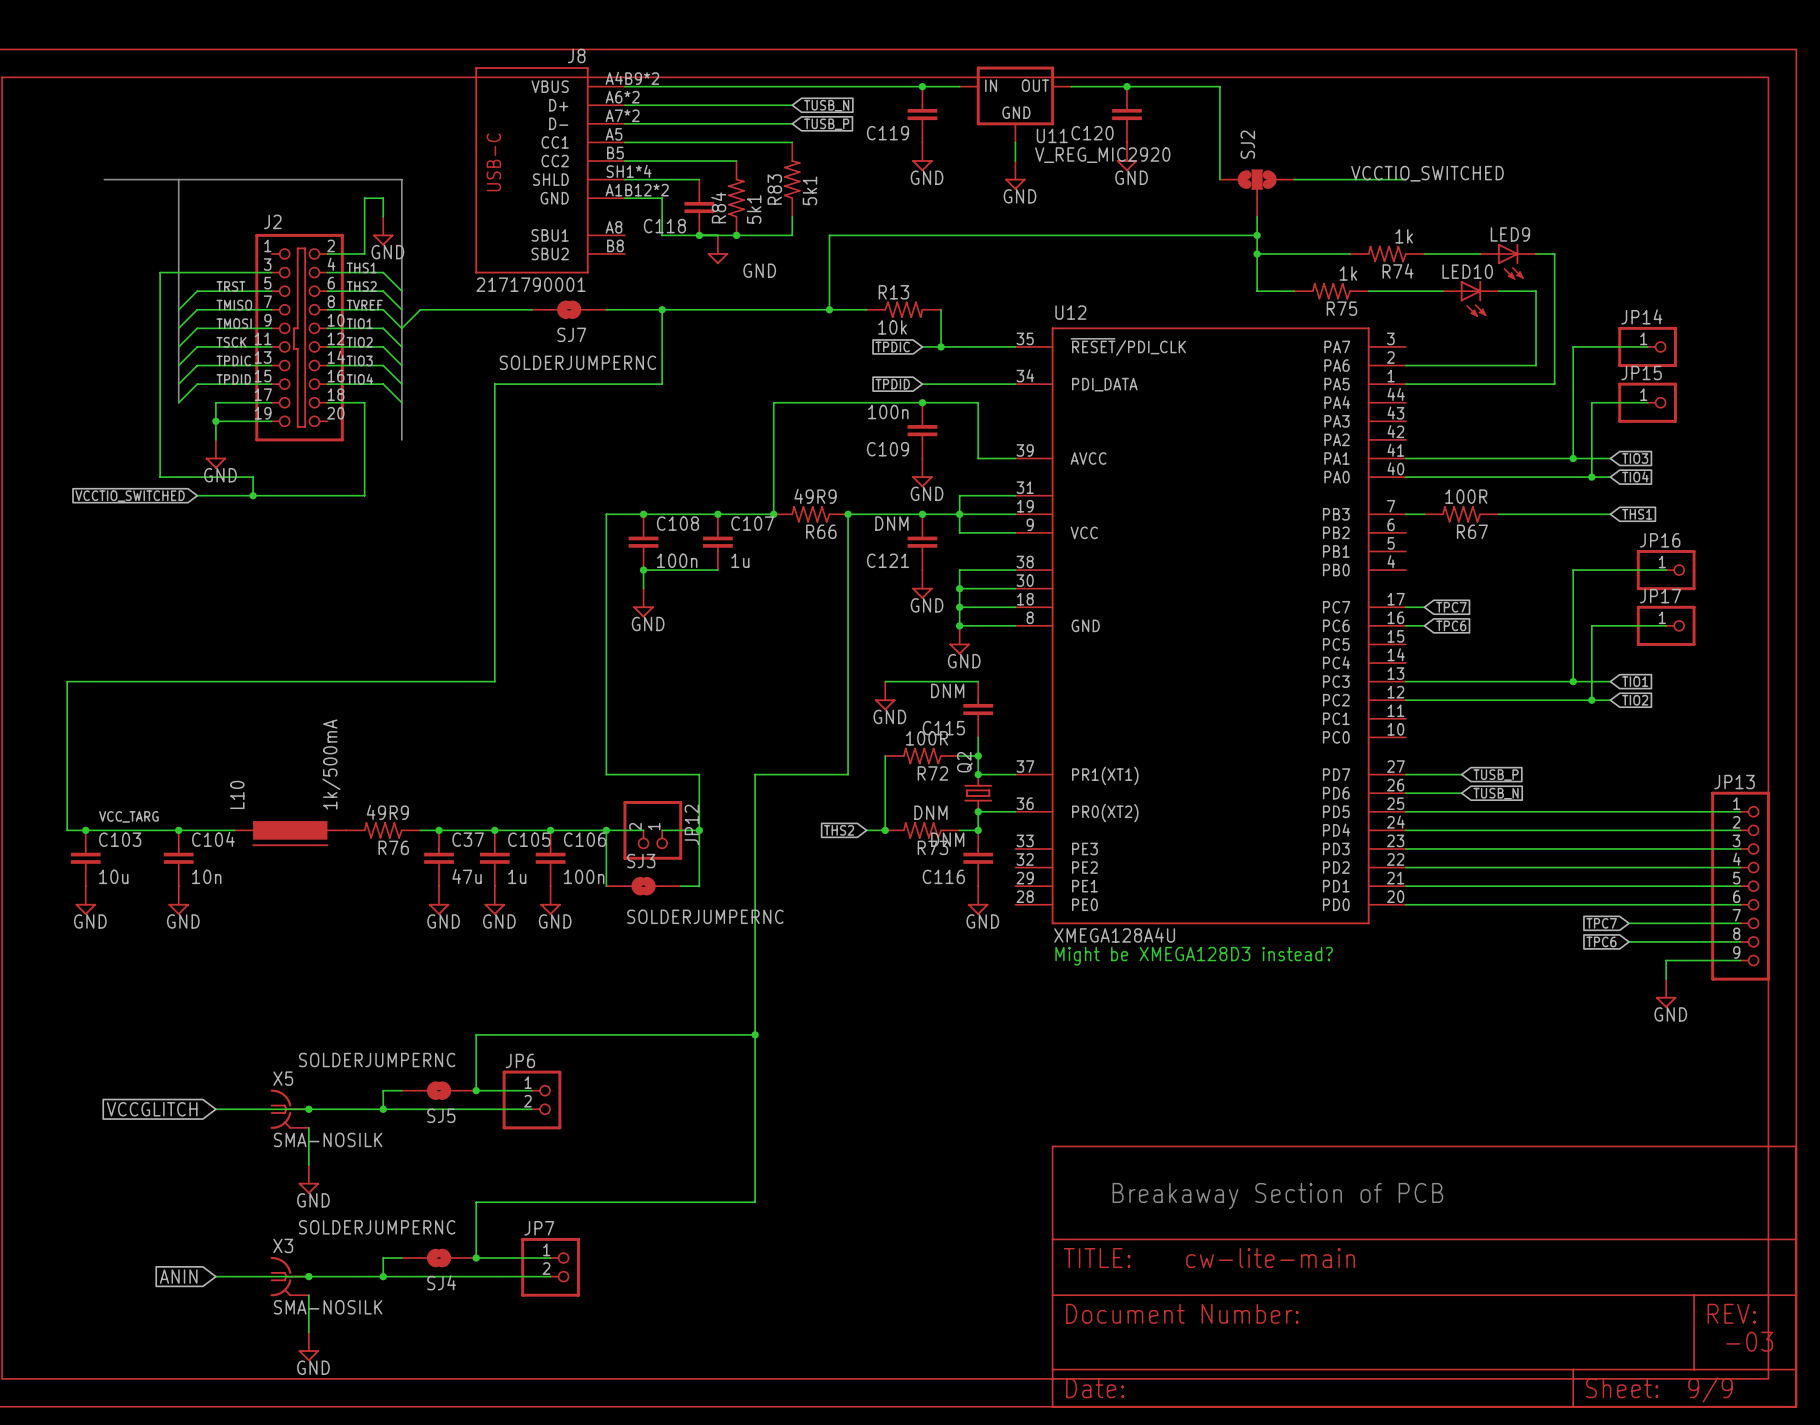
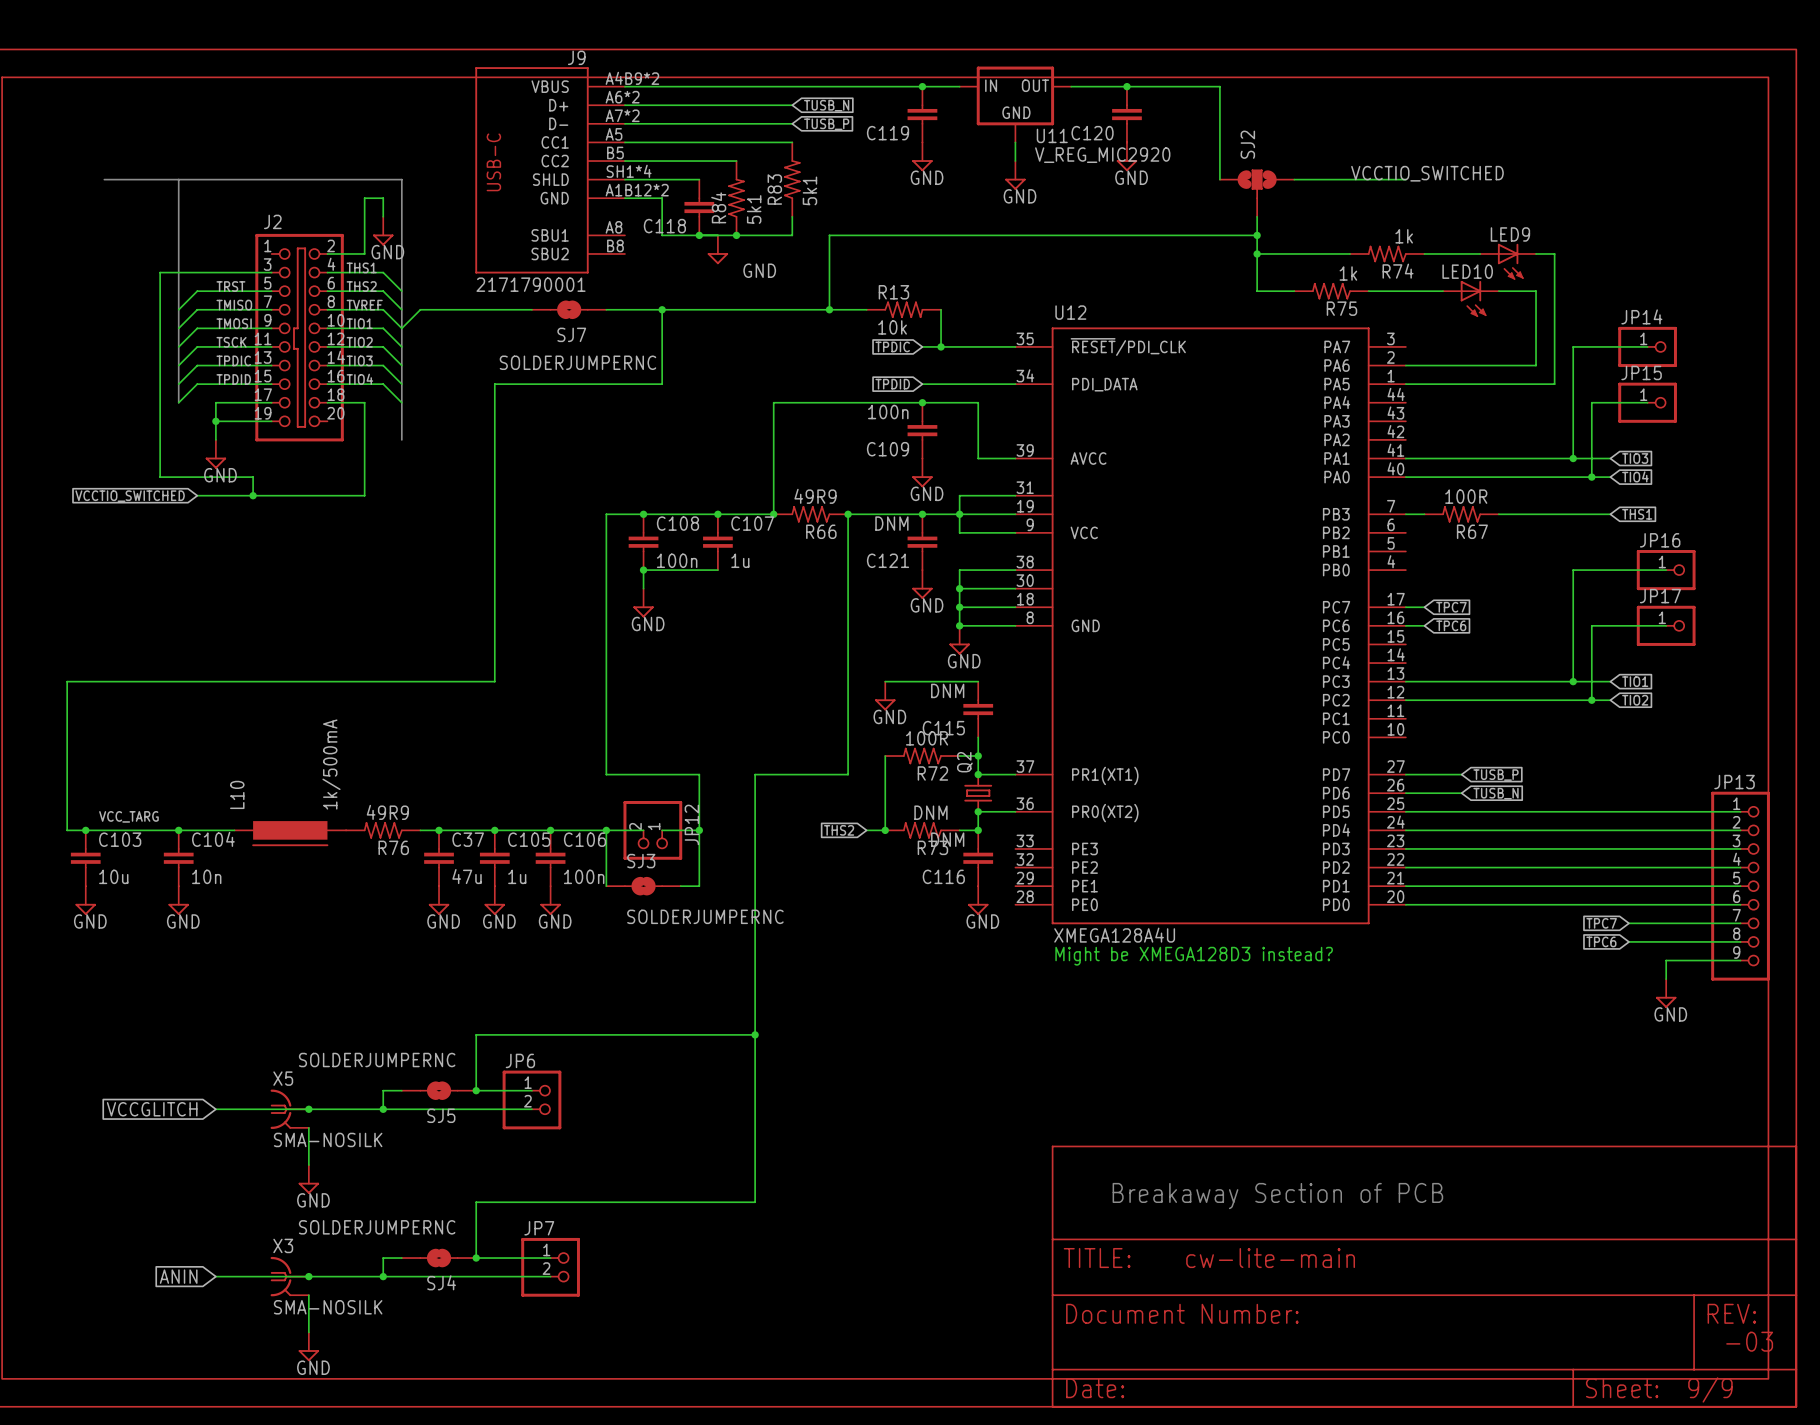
J8 name: J8 (576, 55) -> J9 (576, 57)

